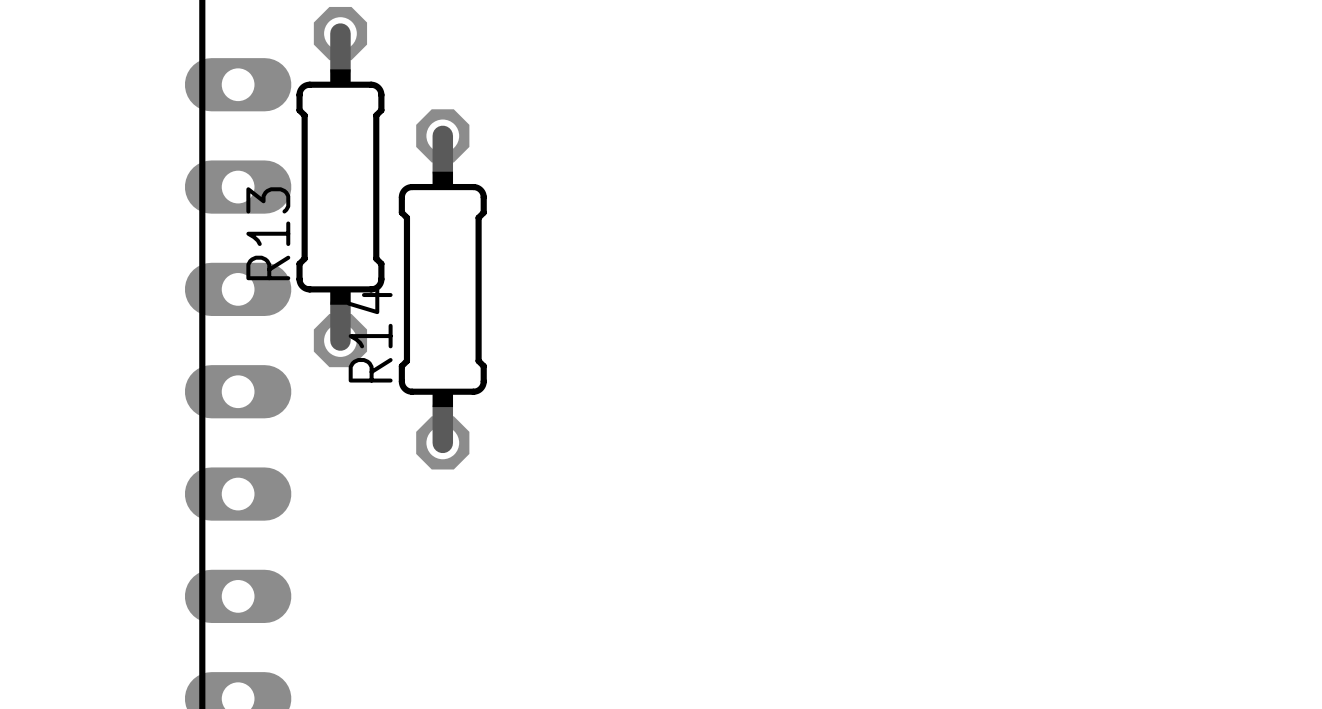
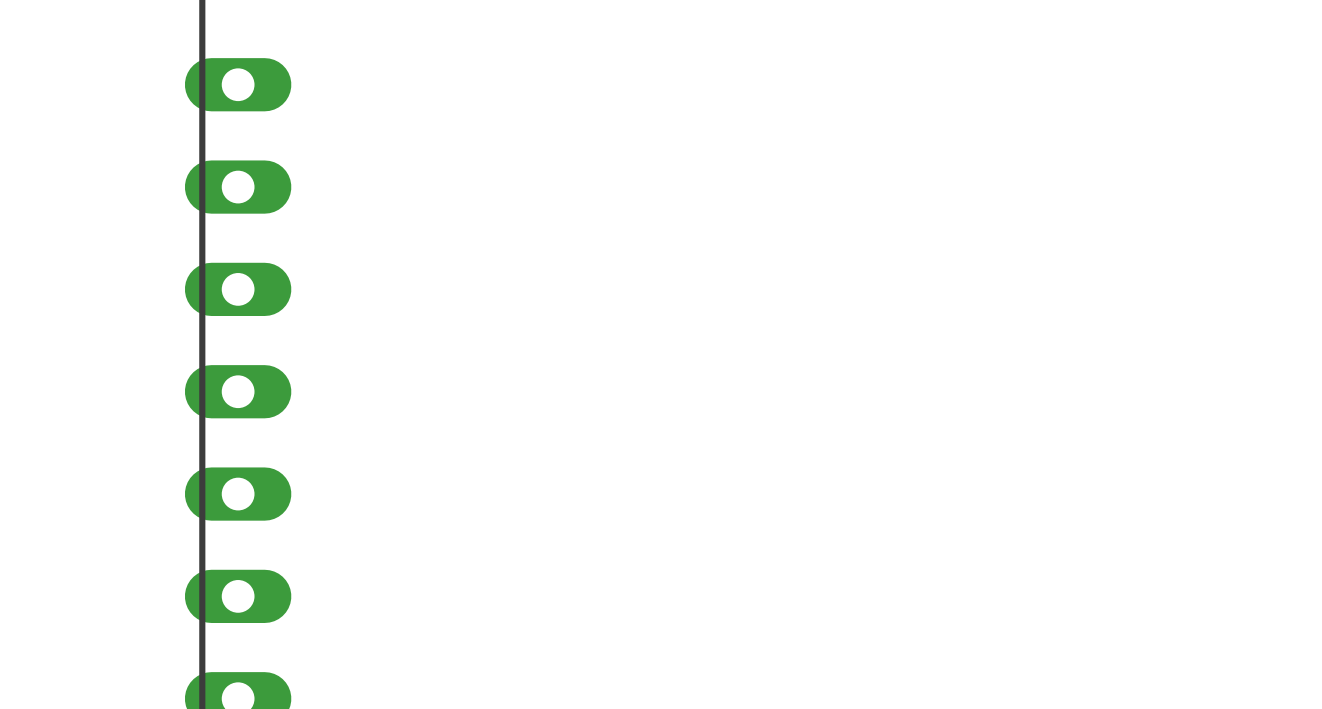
R13: (340, 187) -> none
R14: (442, 289) -> none

